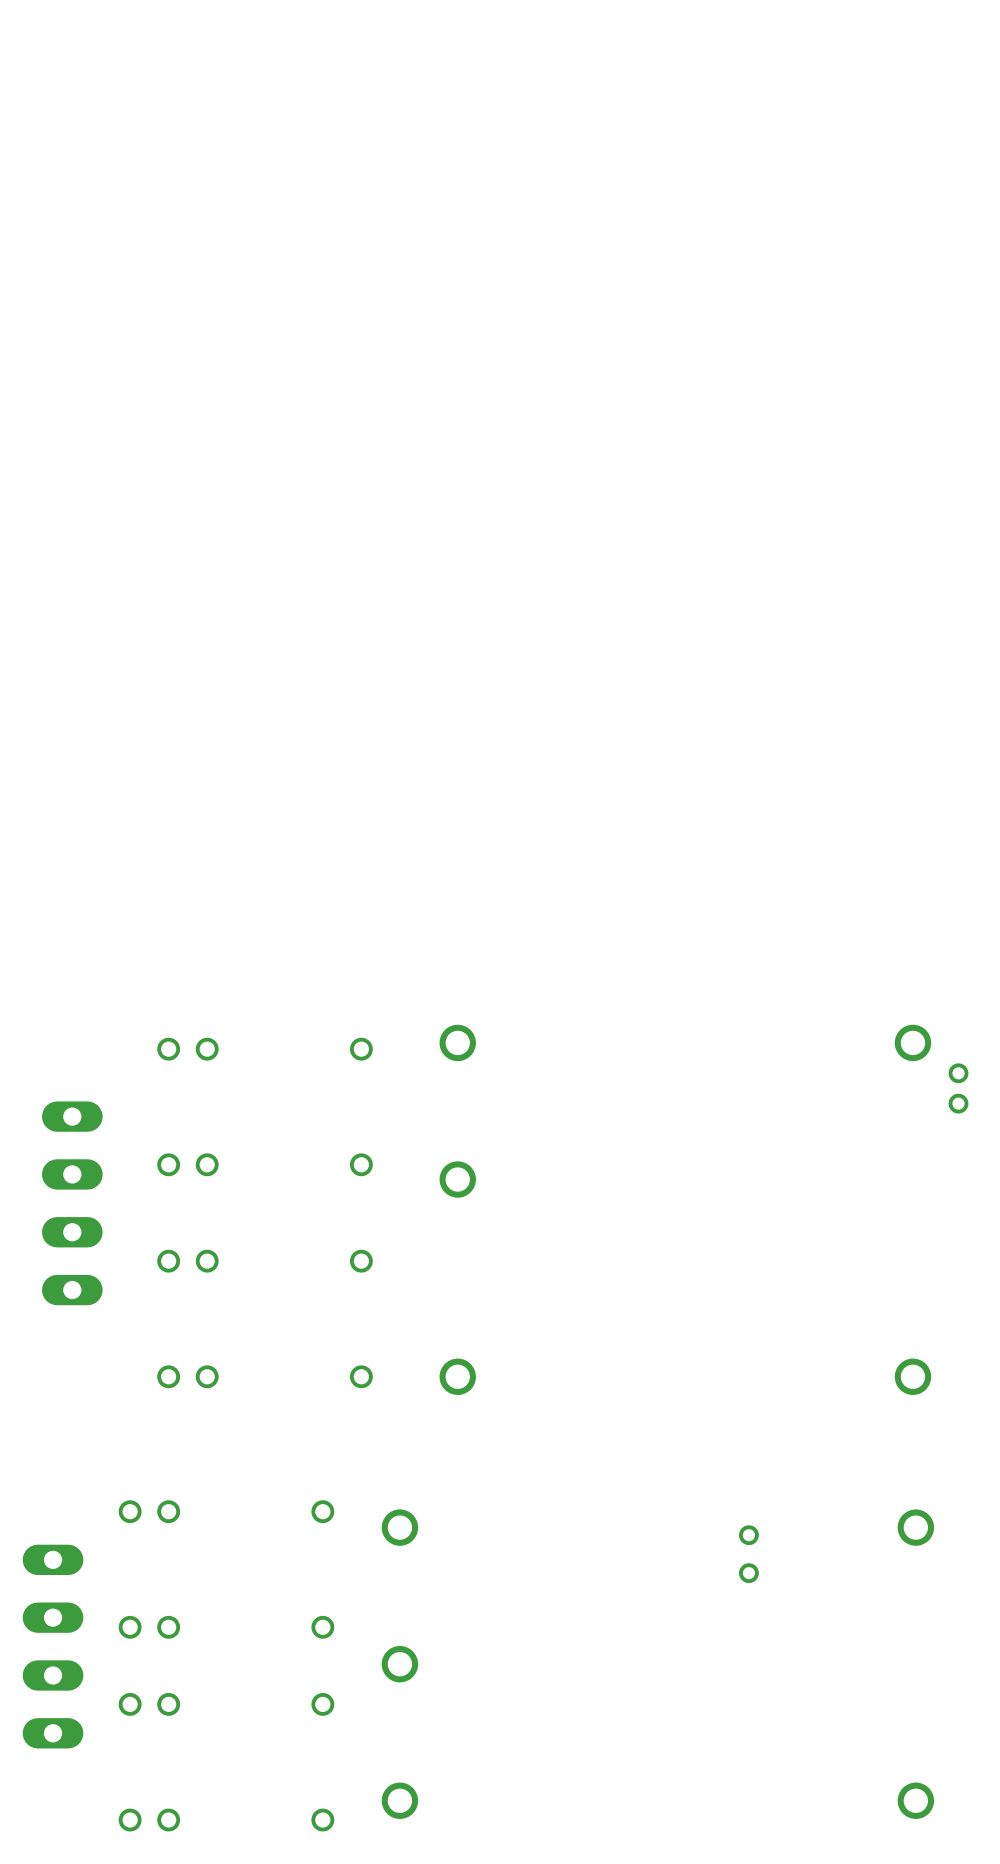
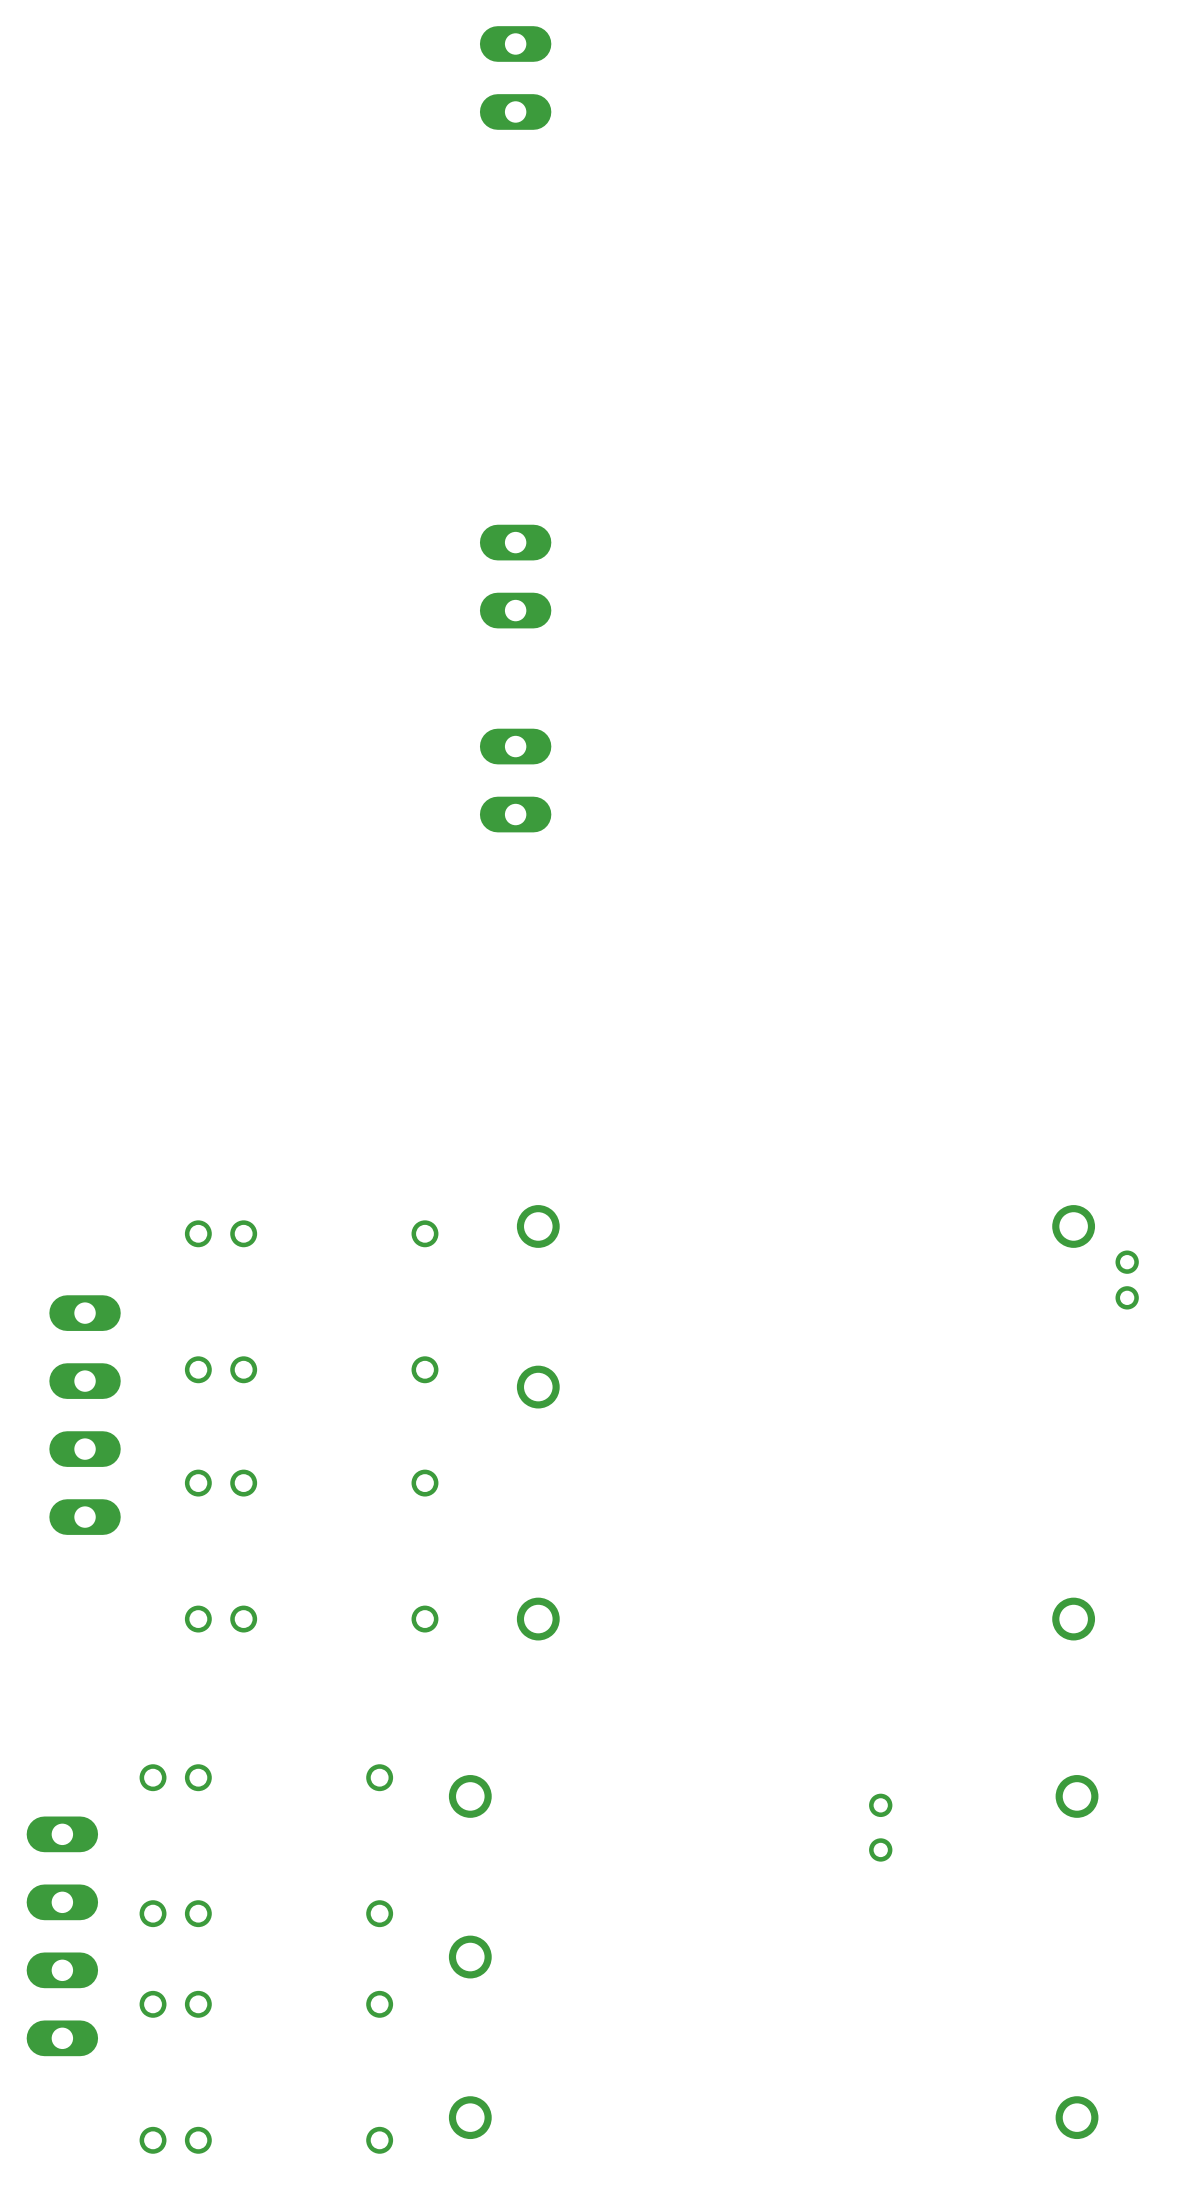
part: none -> (515, 77)
part: none -> (515, 576)
part: none -> (515, 780)

